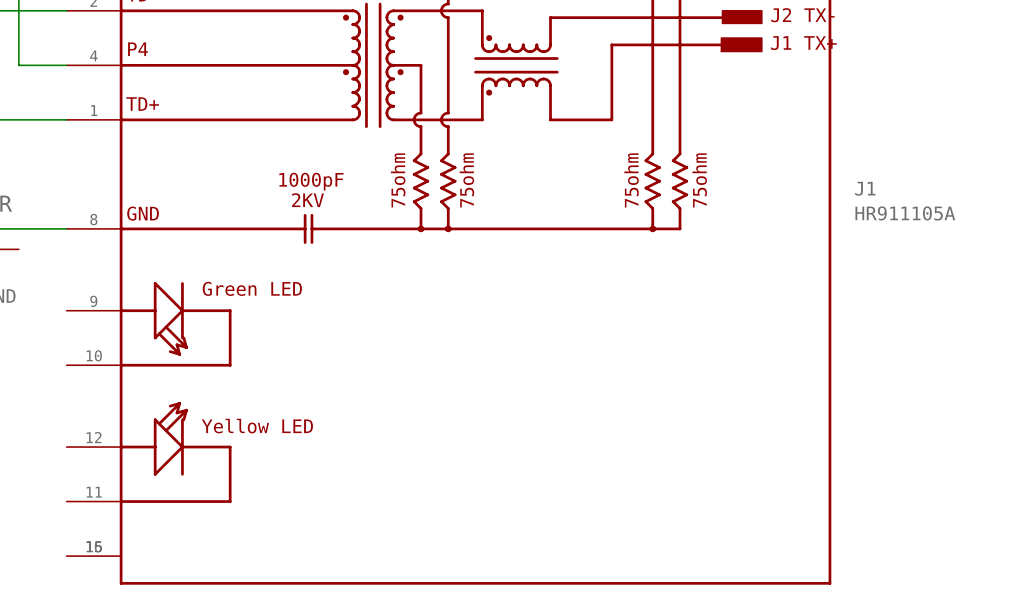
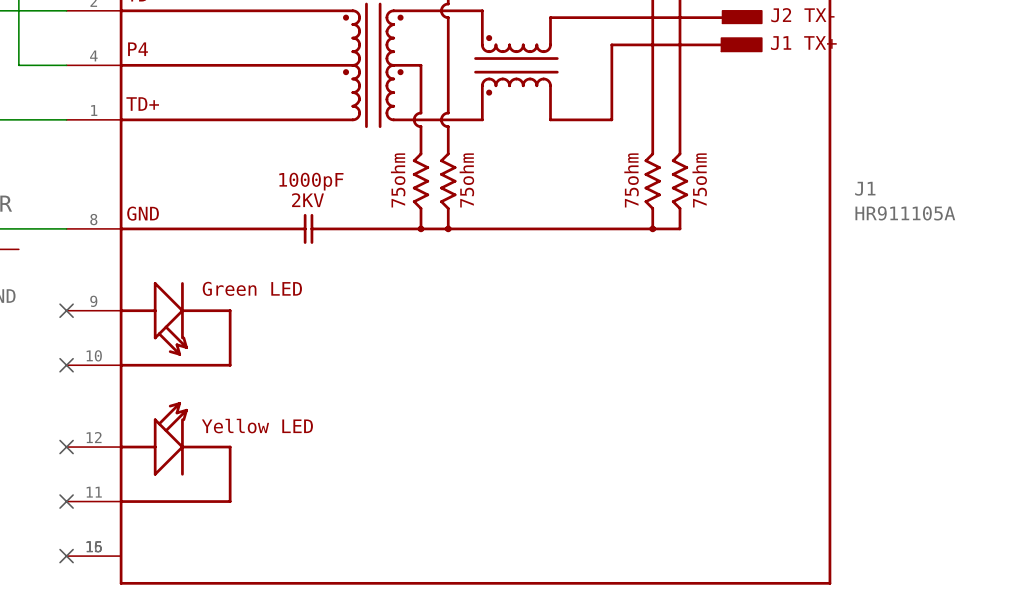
no-connect mark: none -> (66, 310)
no-connect mark: none -> (66, 365)
no-connect mark: none -> (66, 447)
no-connect mark: none -> (66, 501)
no-connect mark: none -> (66, 556)

